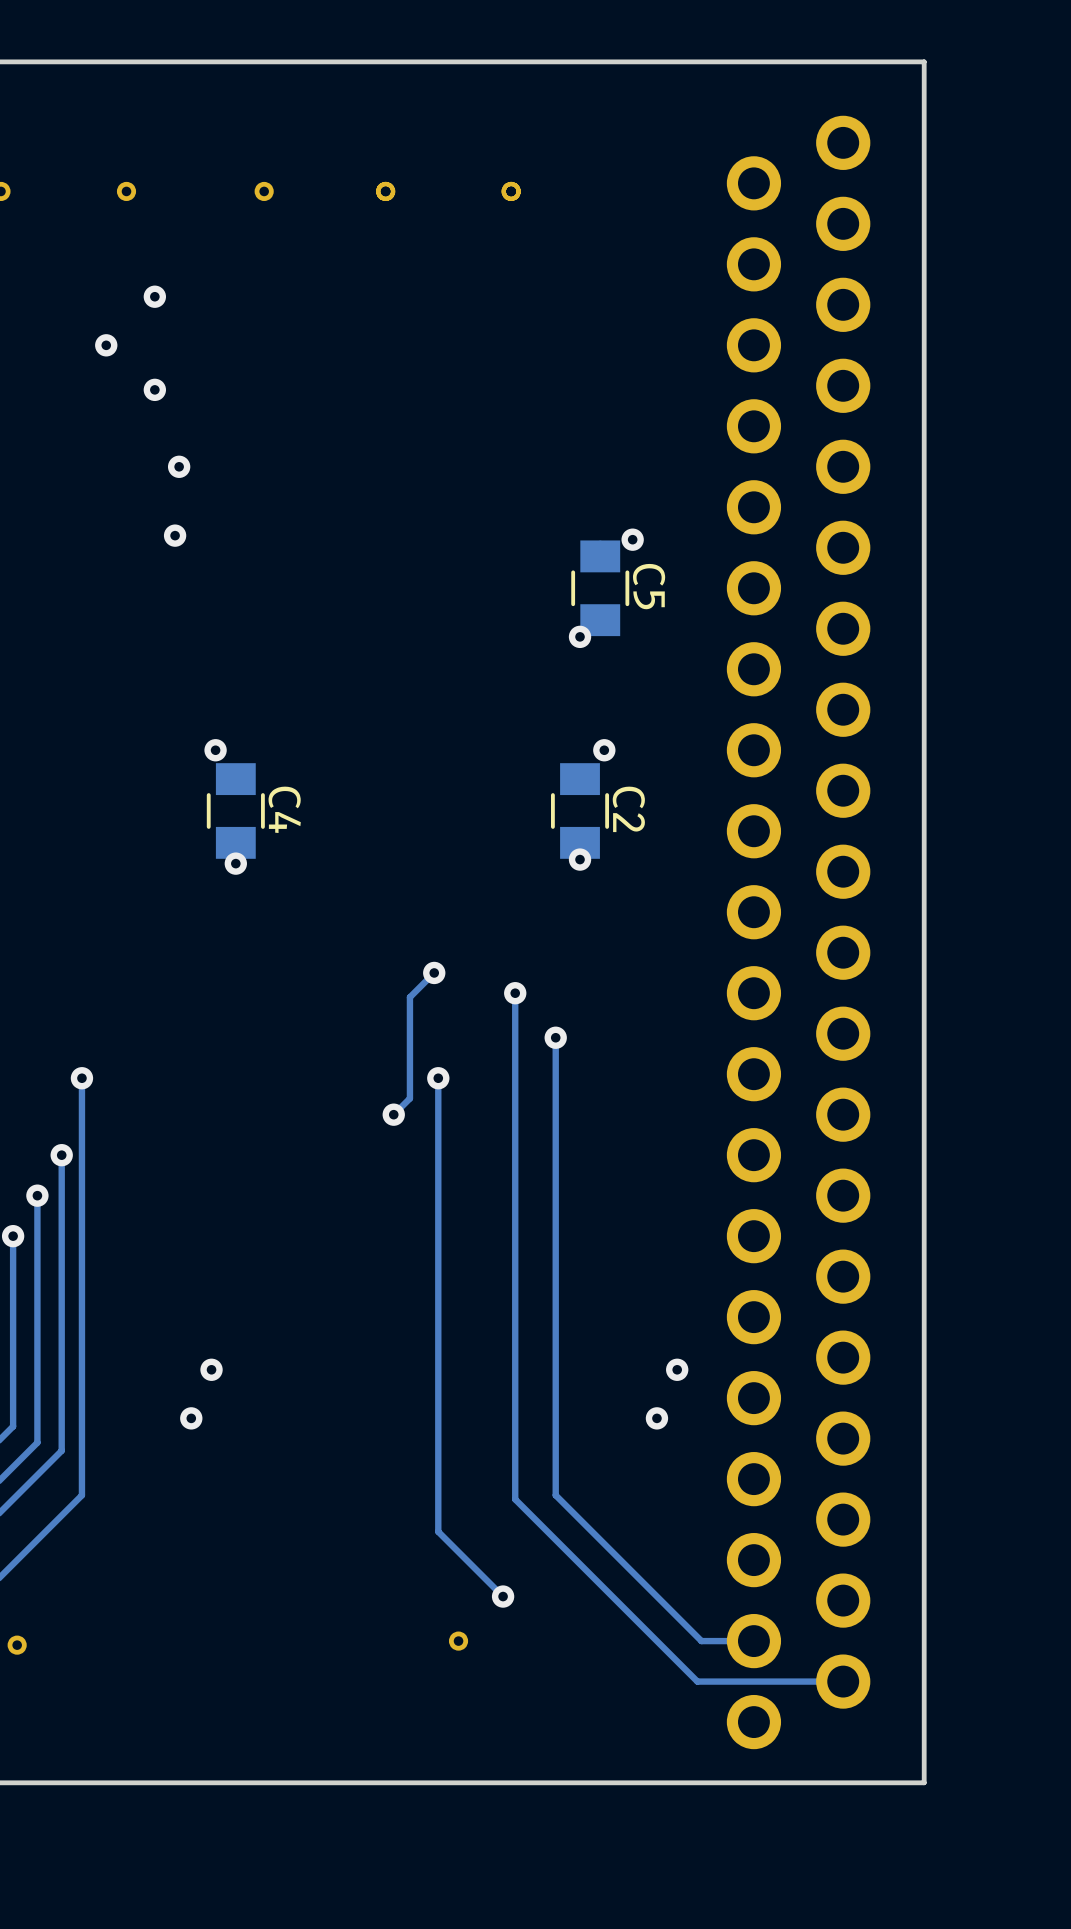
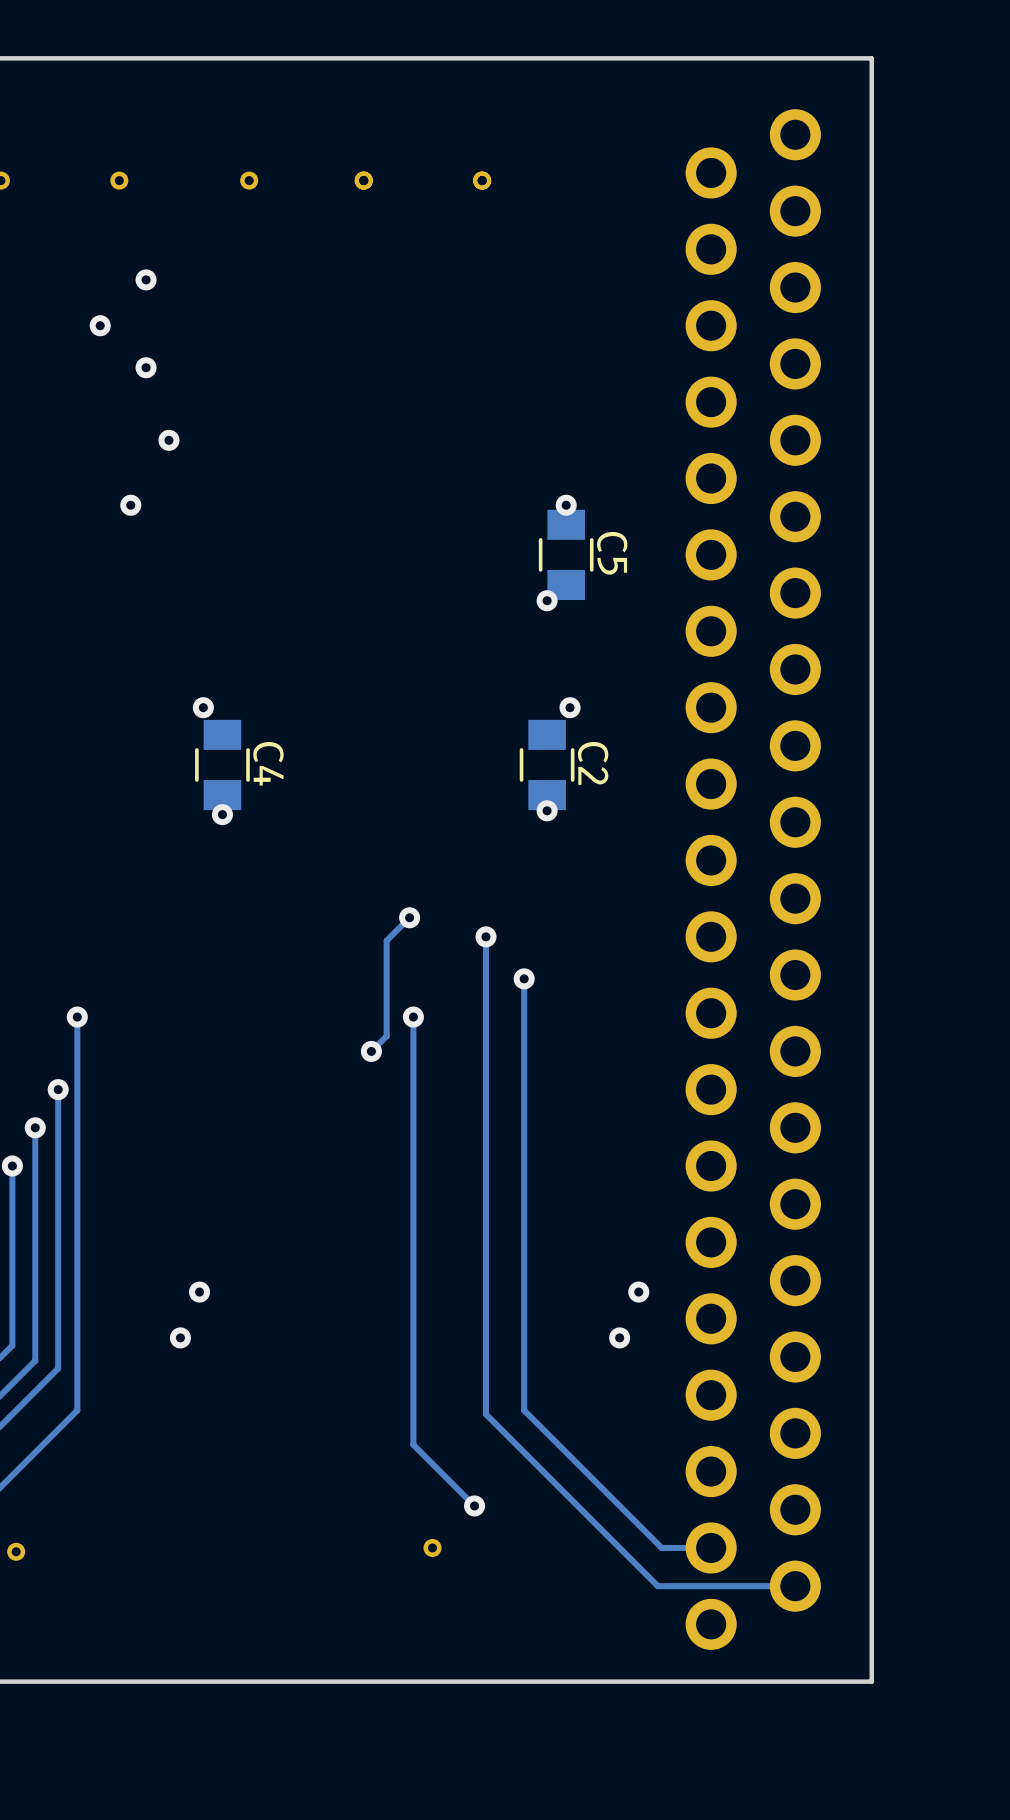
via position: (175, 535) -> (130, 505)
via position: (632, 539) -> (566, 505)

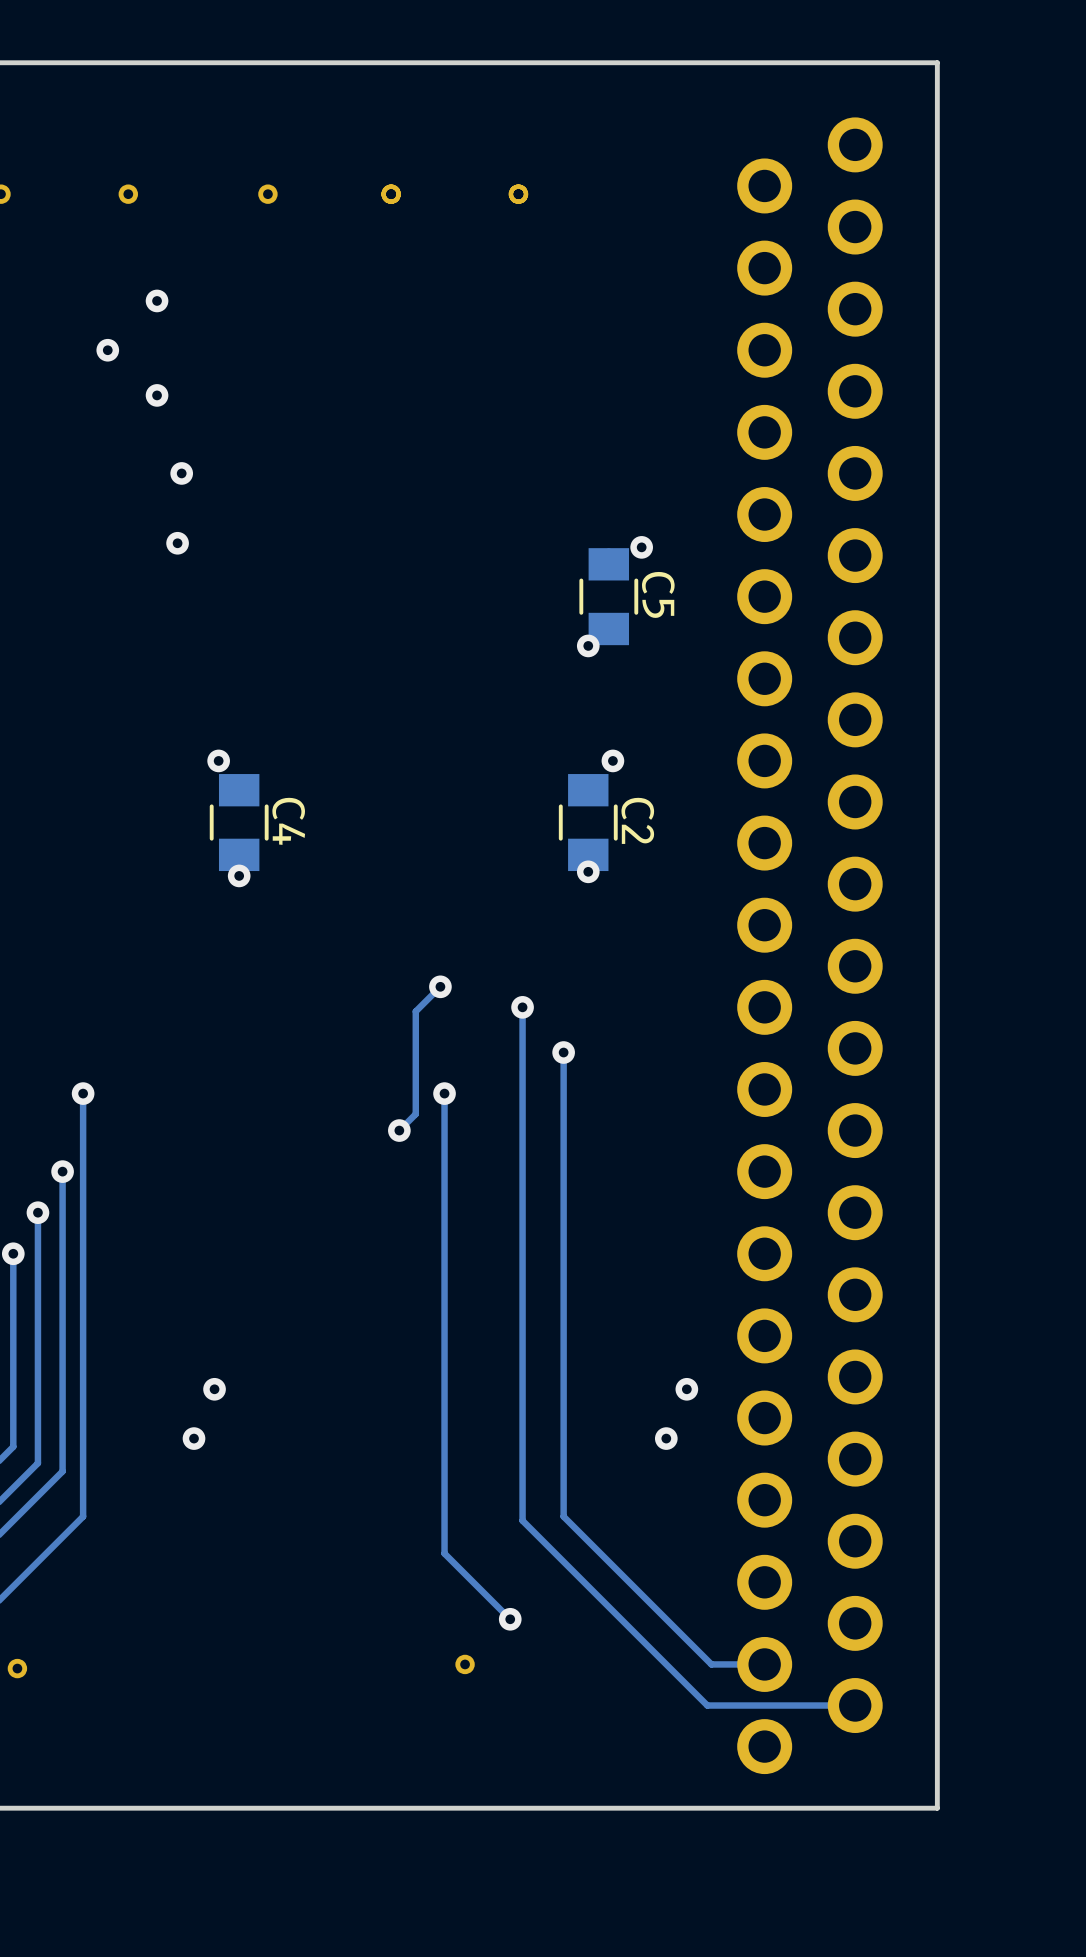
via position: (130, 505) -> (177, 543)
via position: (566, 505) -> (641, 547)

